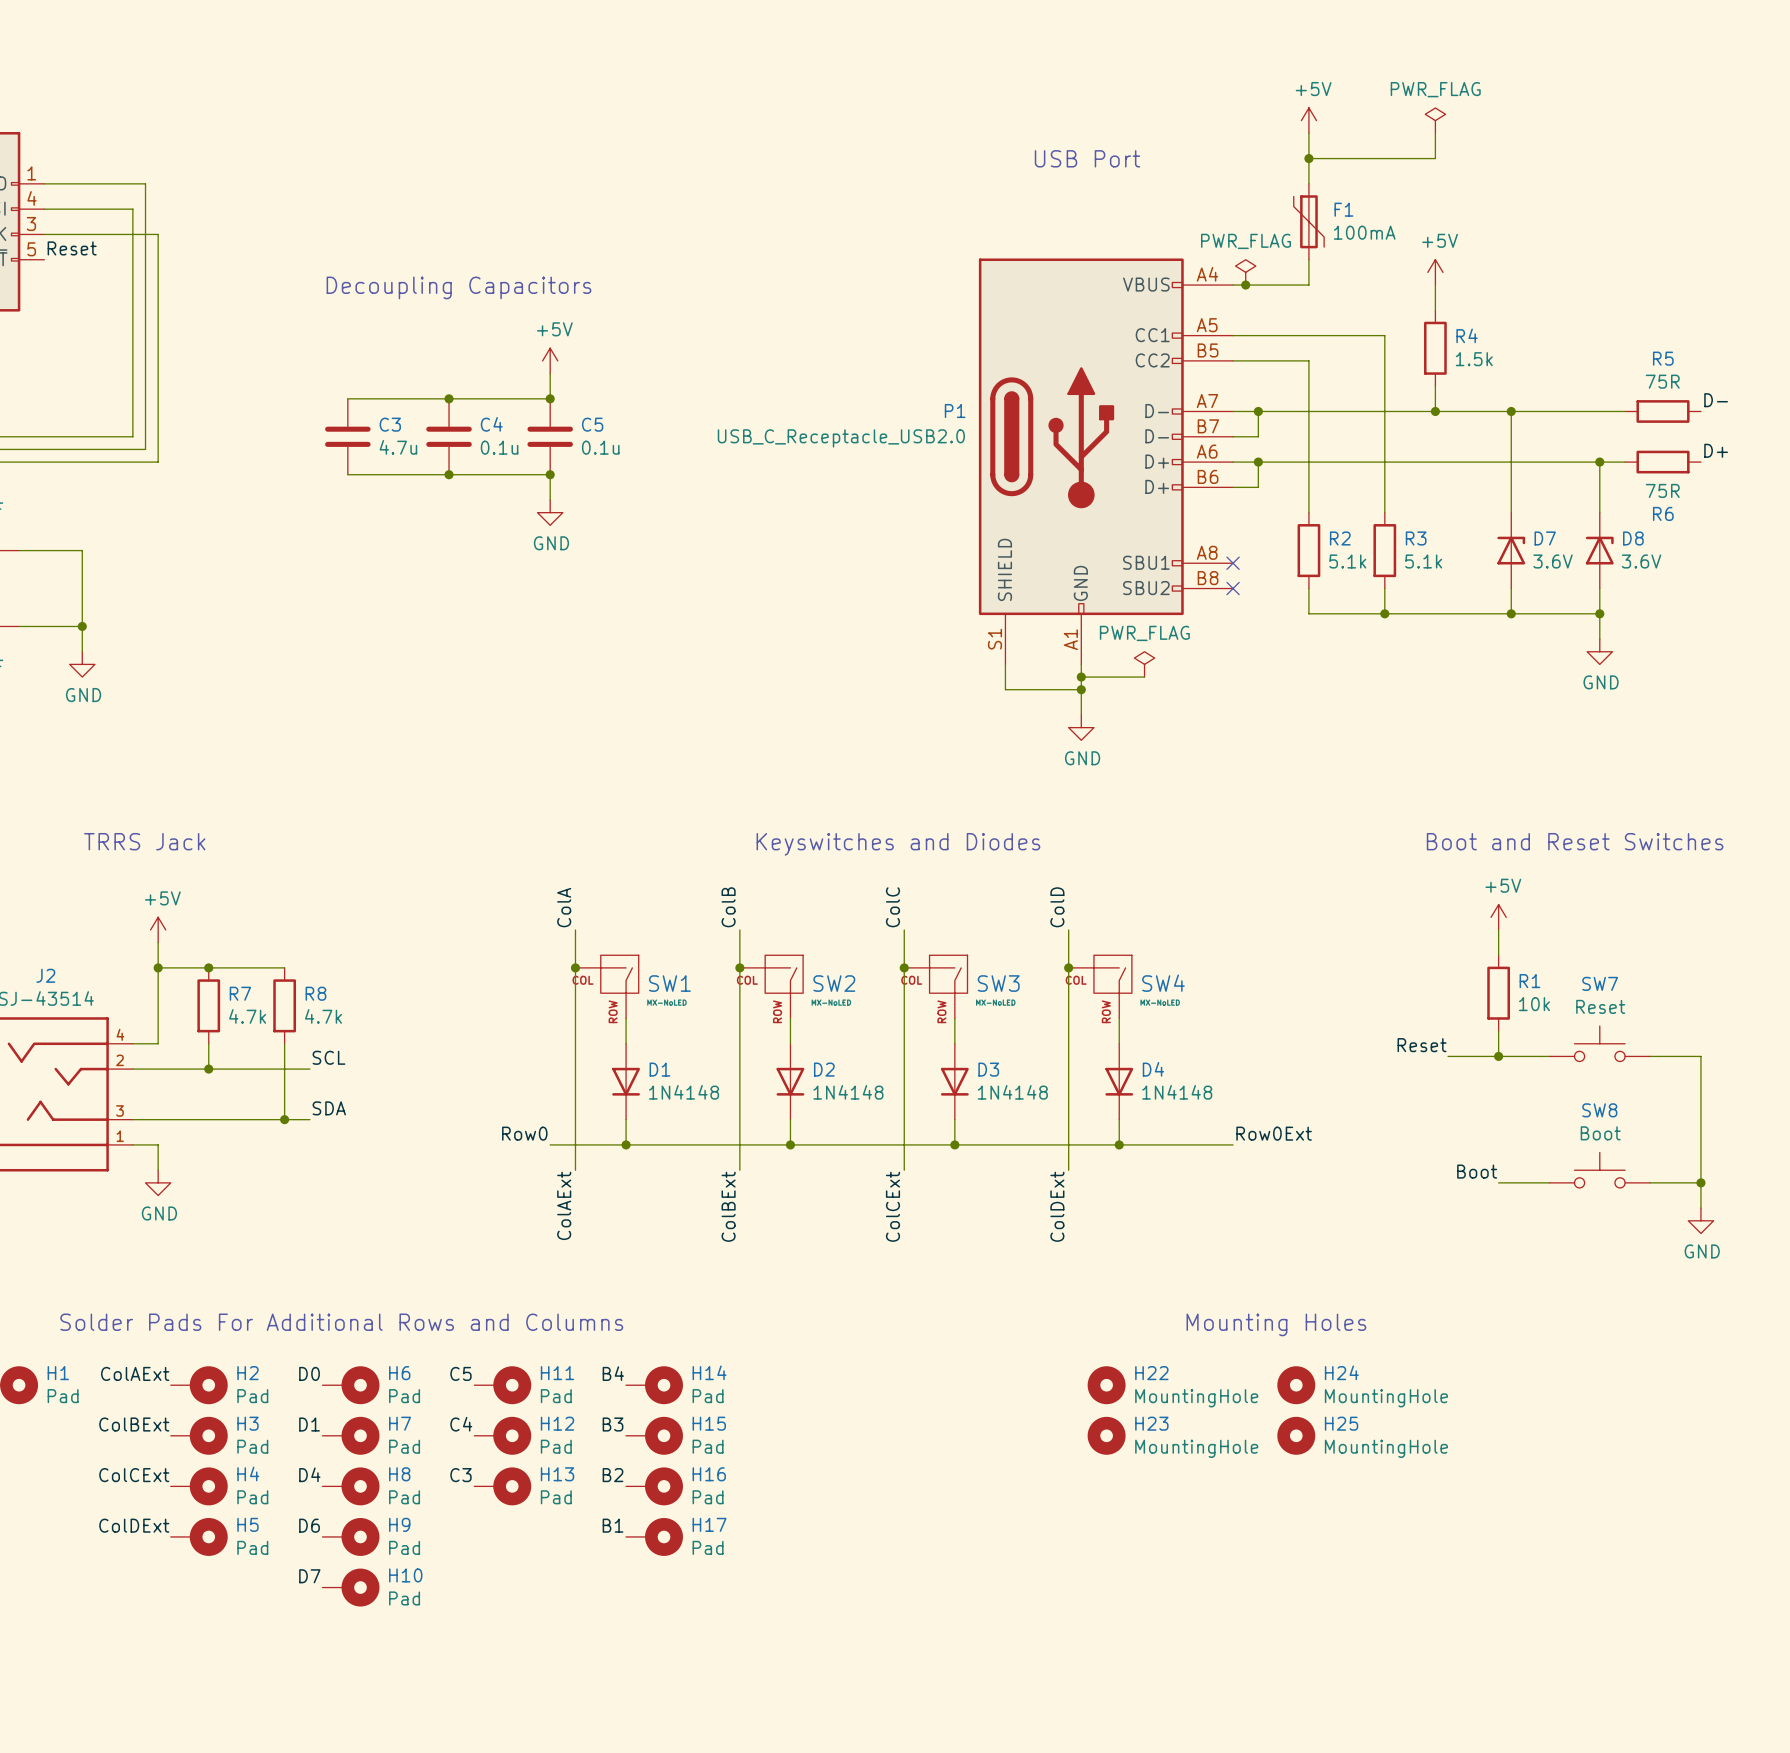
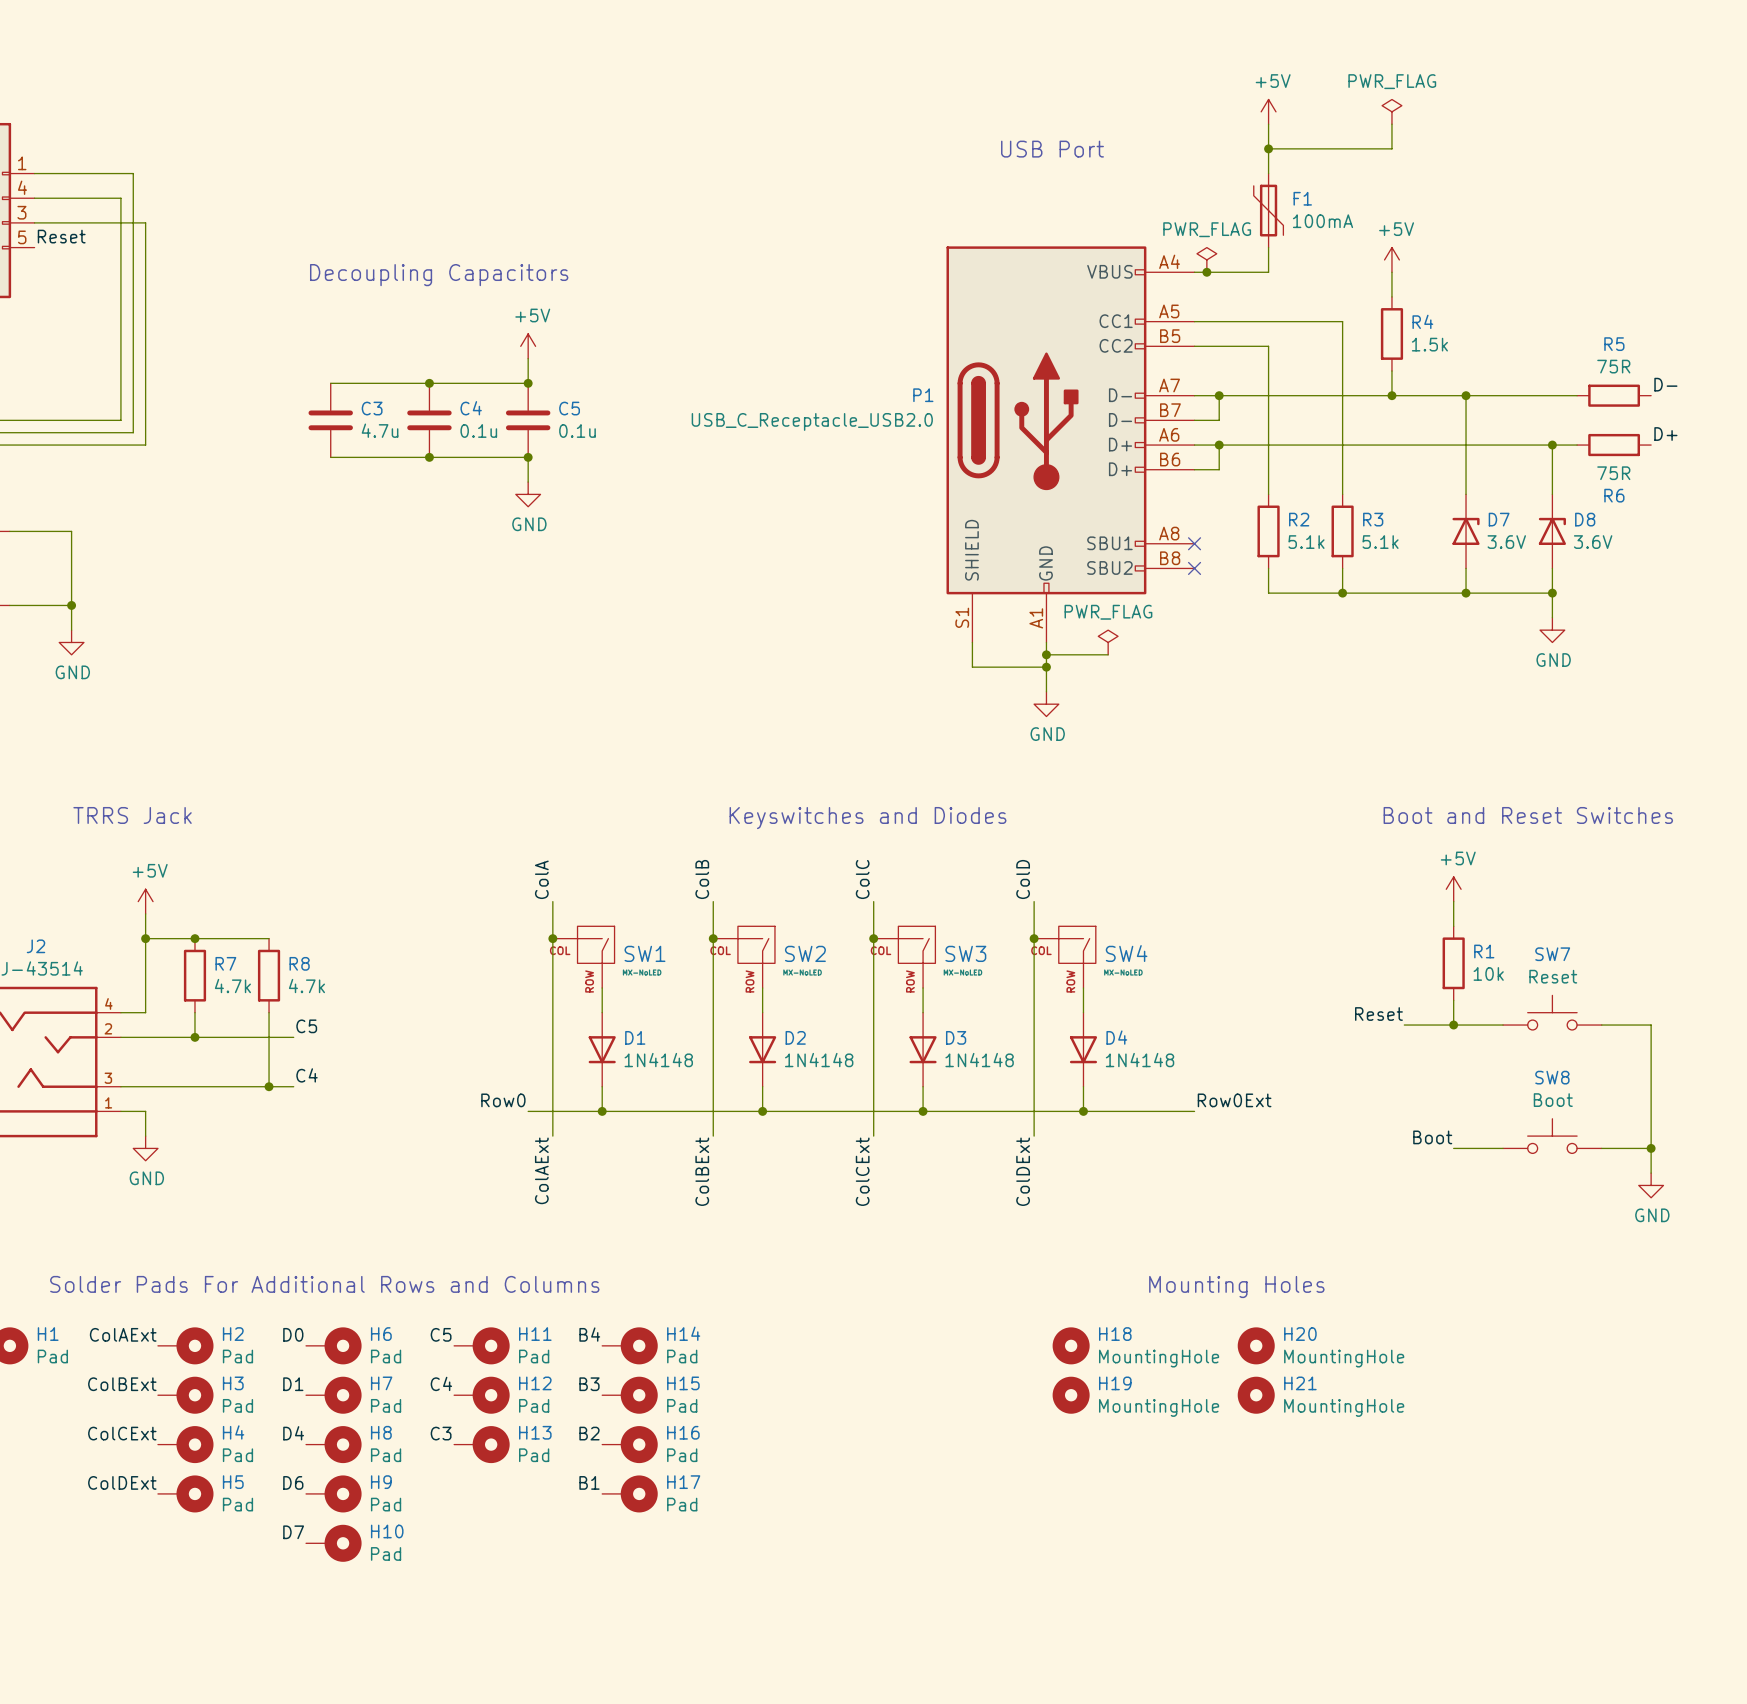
label: SCL (328, 1057) -> C5 (306, 1026)
label: SDA (329, 1108) -> C4 (307, 1075)
H24 name: H24 (1341, 1372) -> H20 (1300, 1334)
H22 name: H22 (1151, 1373) -> H18 (1115, 1334)
H23 name: H23 (1151, 1423) -> H19 (1115, 1383)
H25 name: H25 (1341, 1423) -> H21 (1300, 1383)

